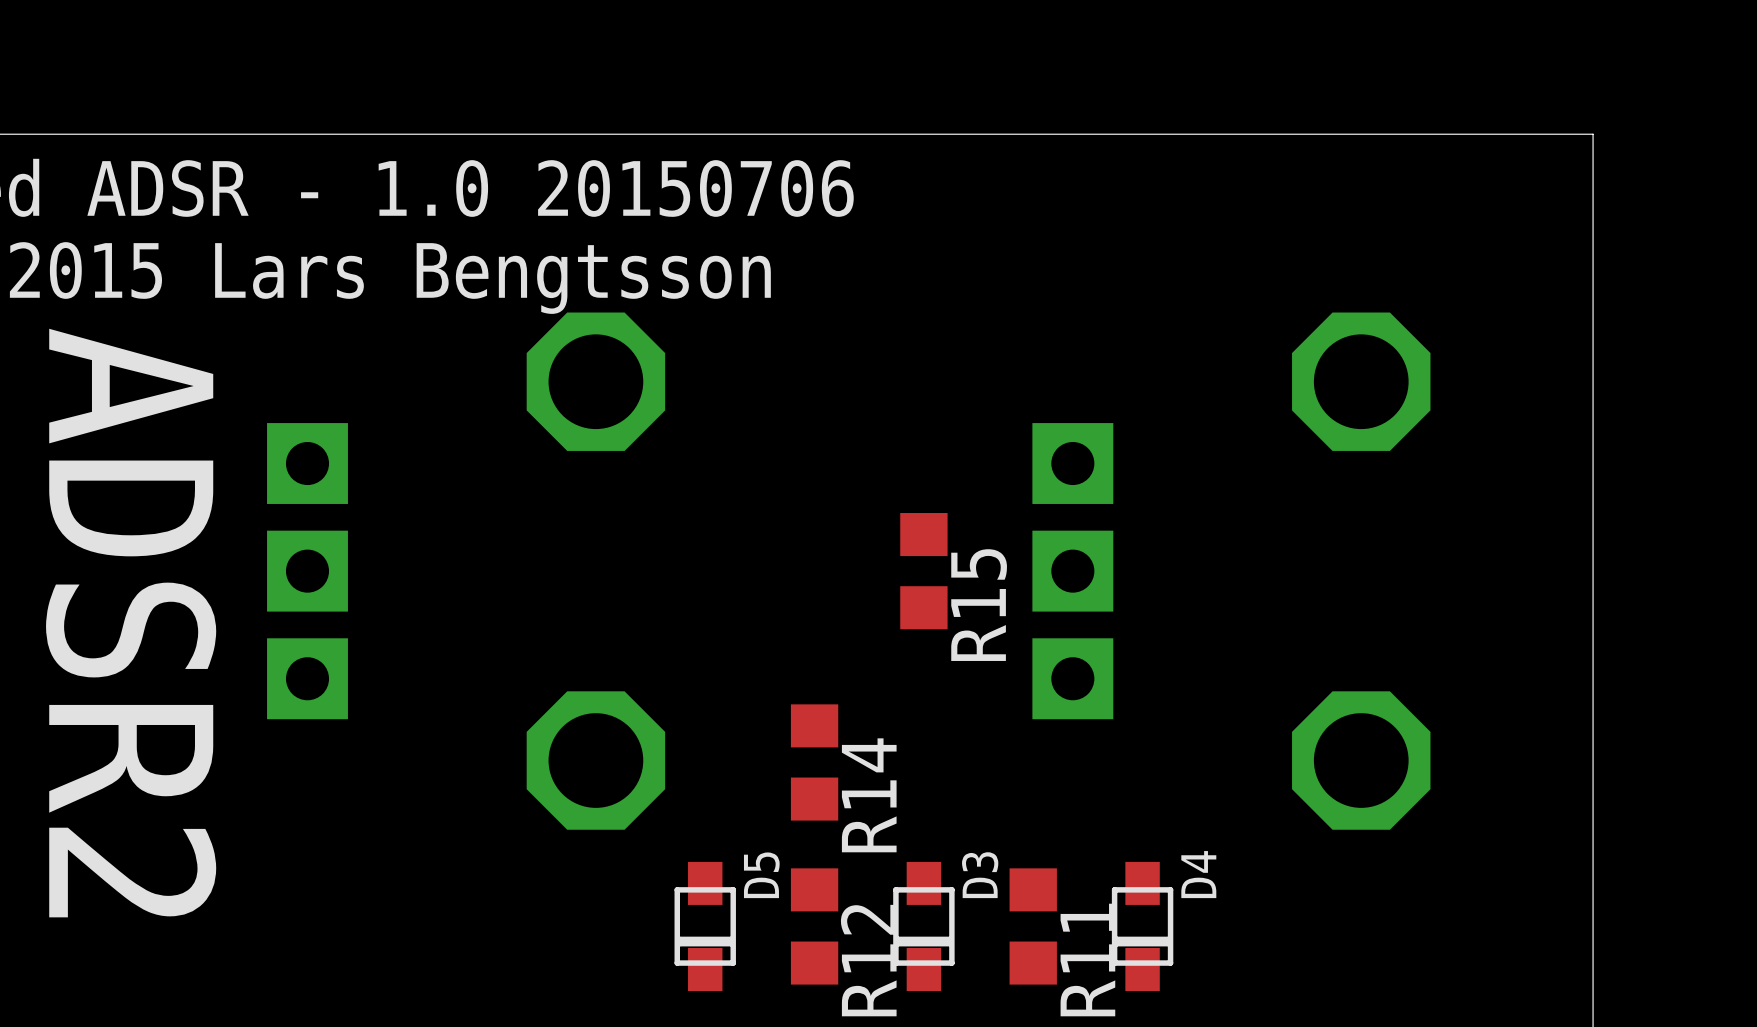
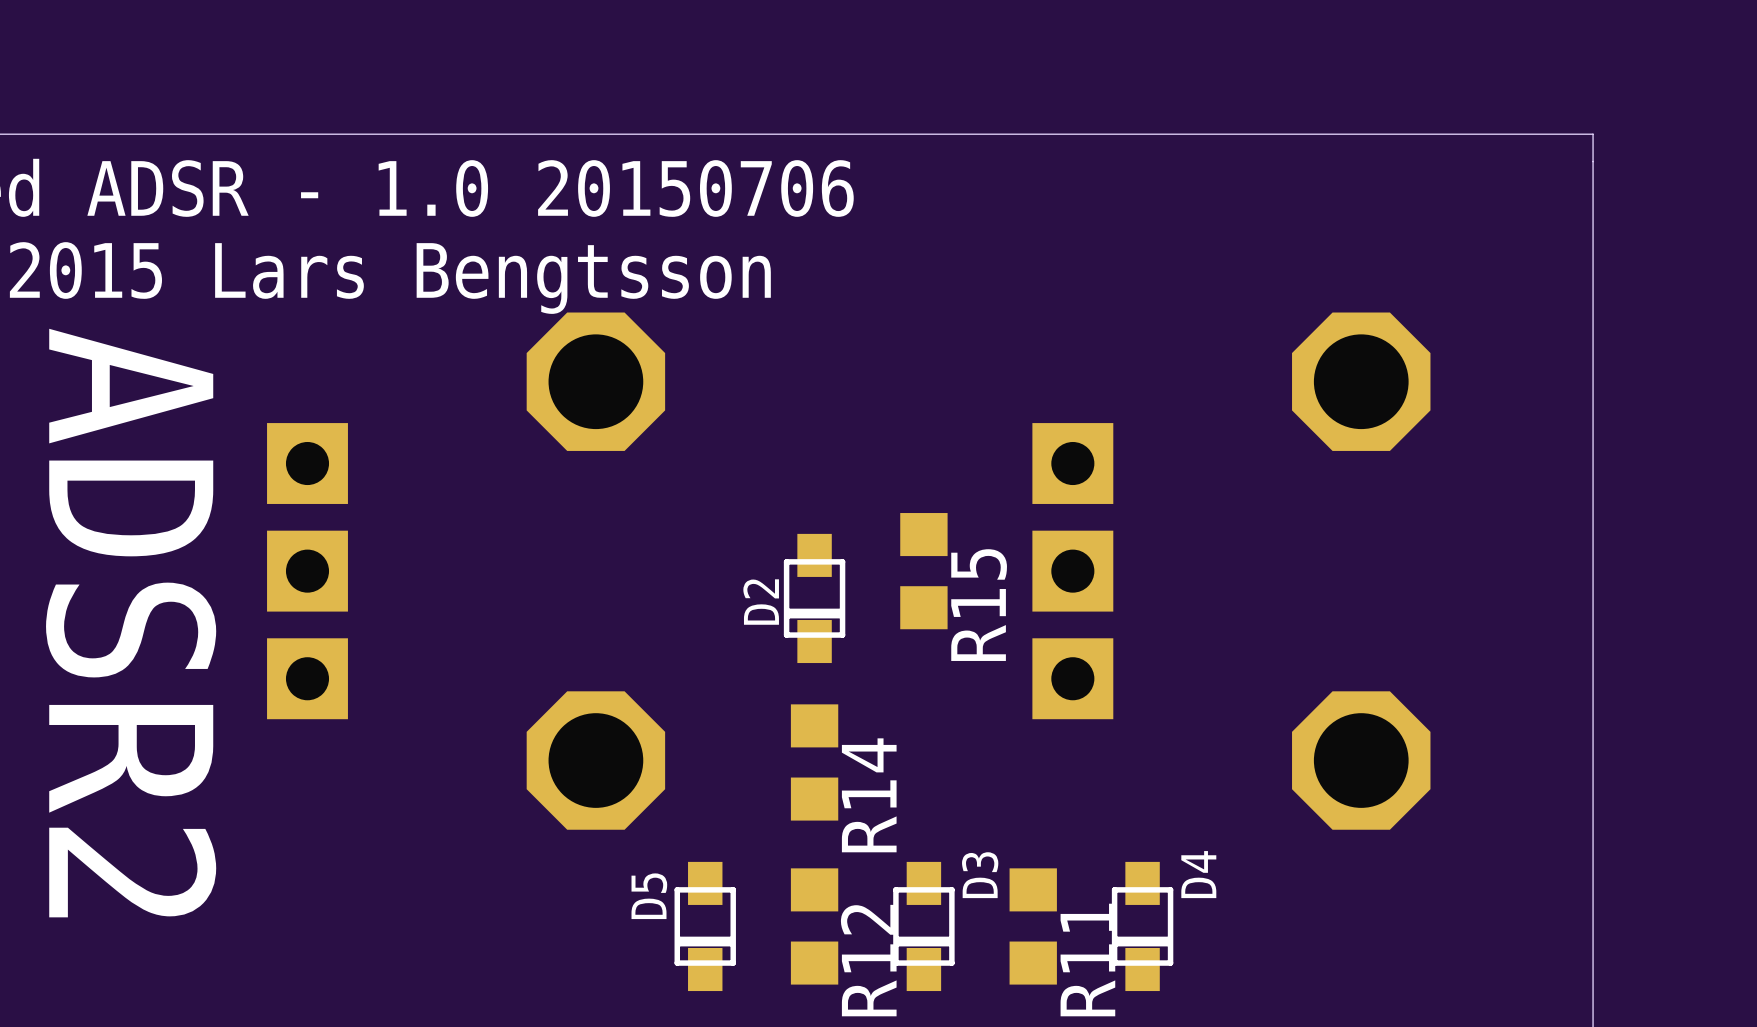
D2: none -> (814, 598)
D5 name position: D5 (761, 875) -> D5 (649, 896)

